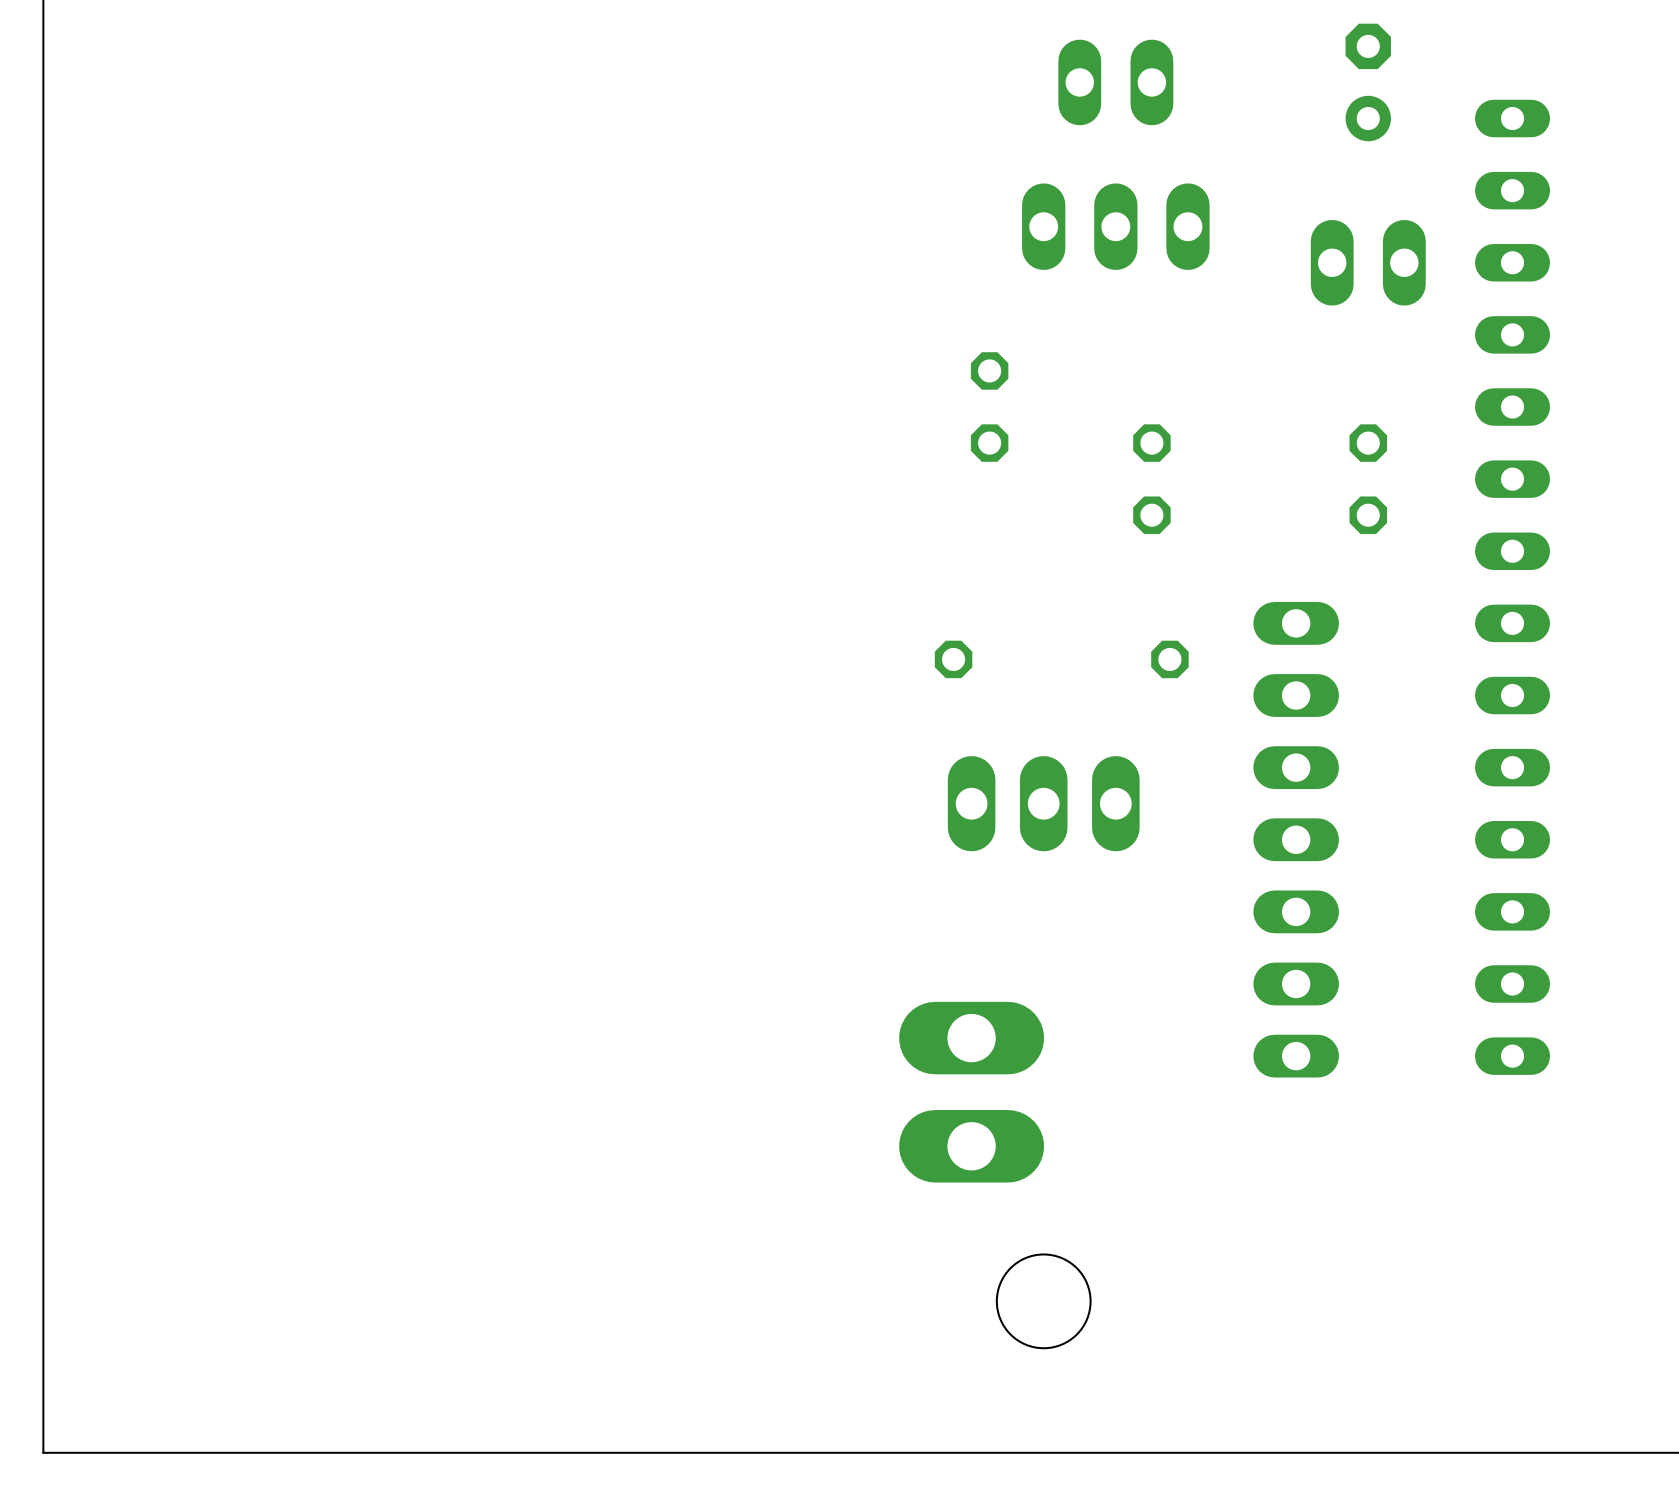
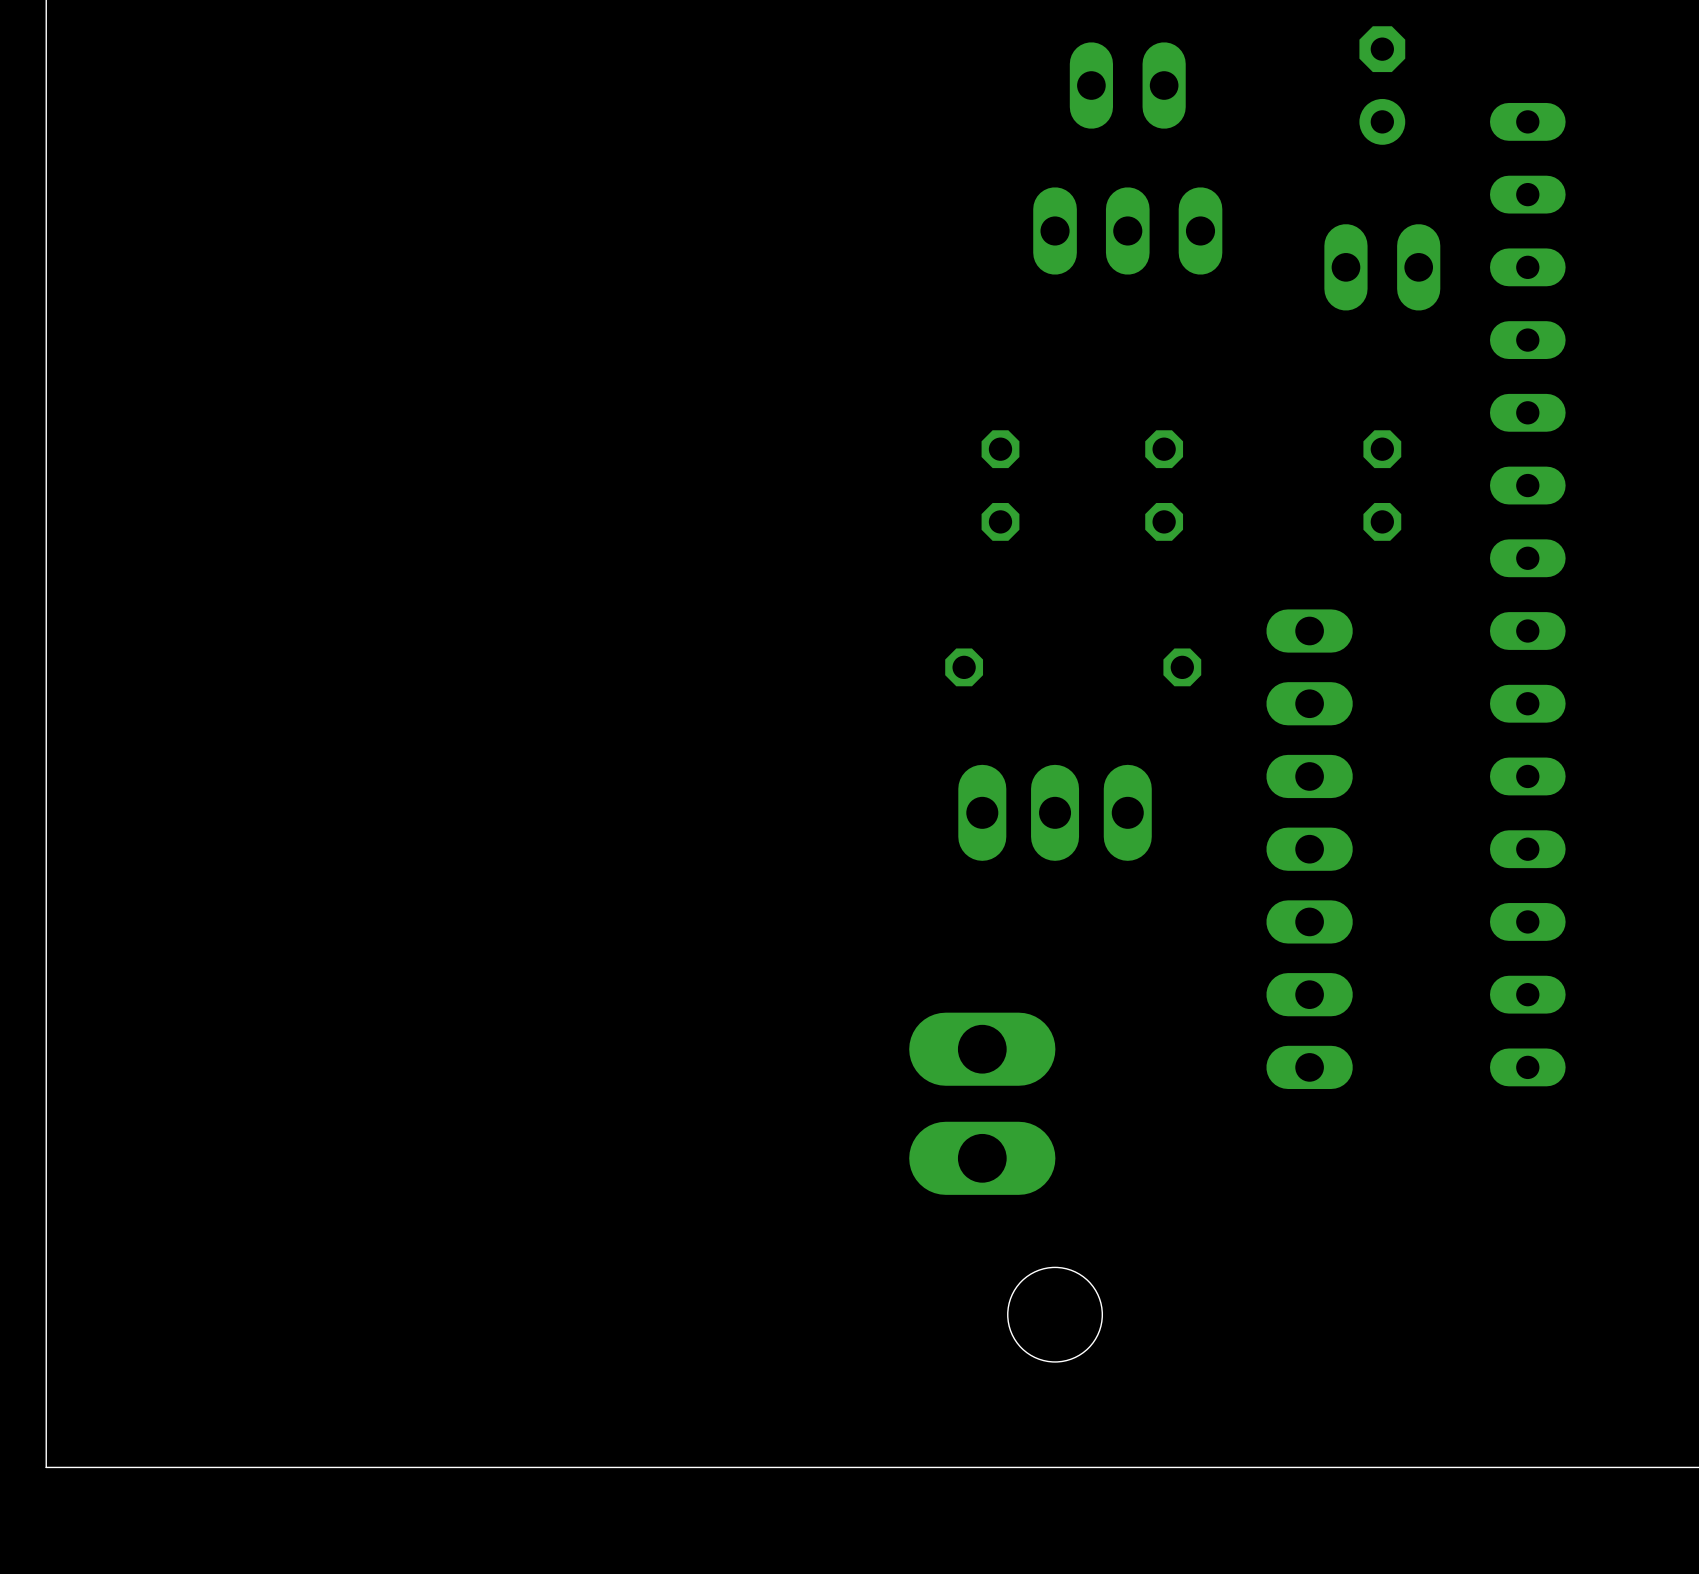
part position: (989, 407) -> (1000, 485)

